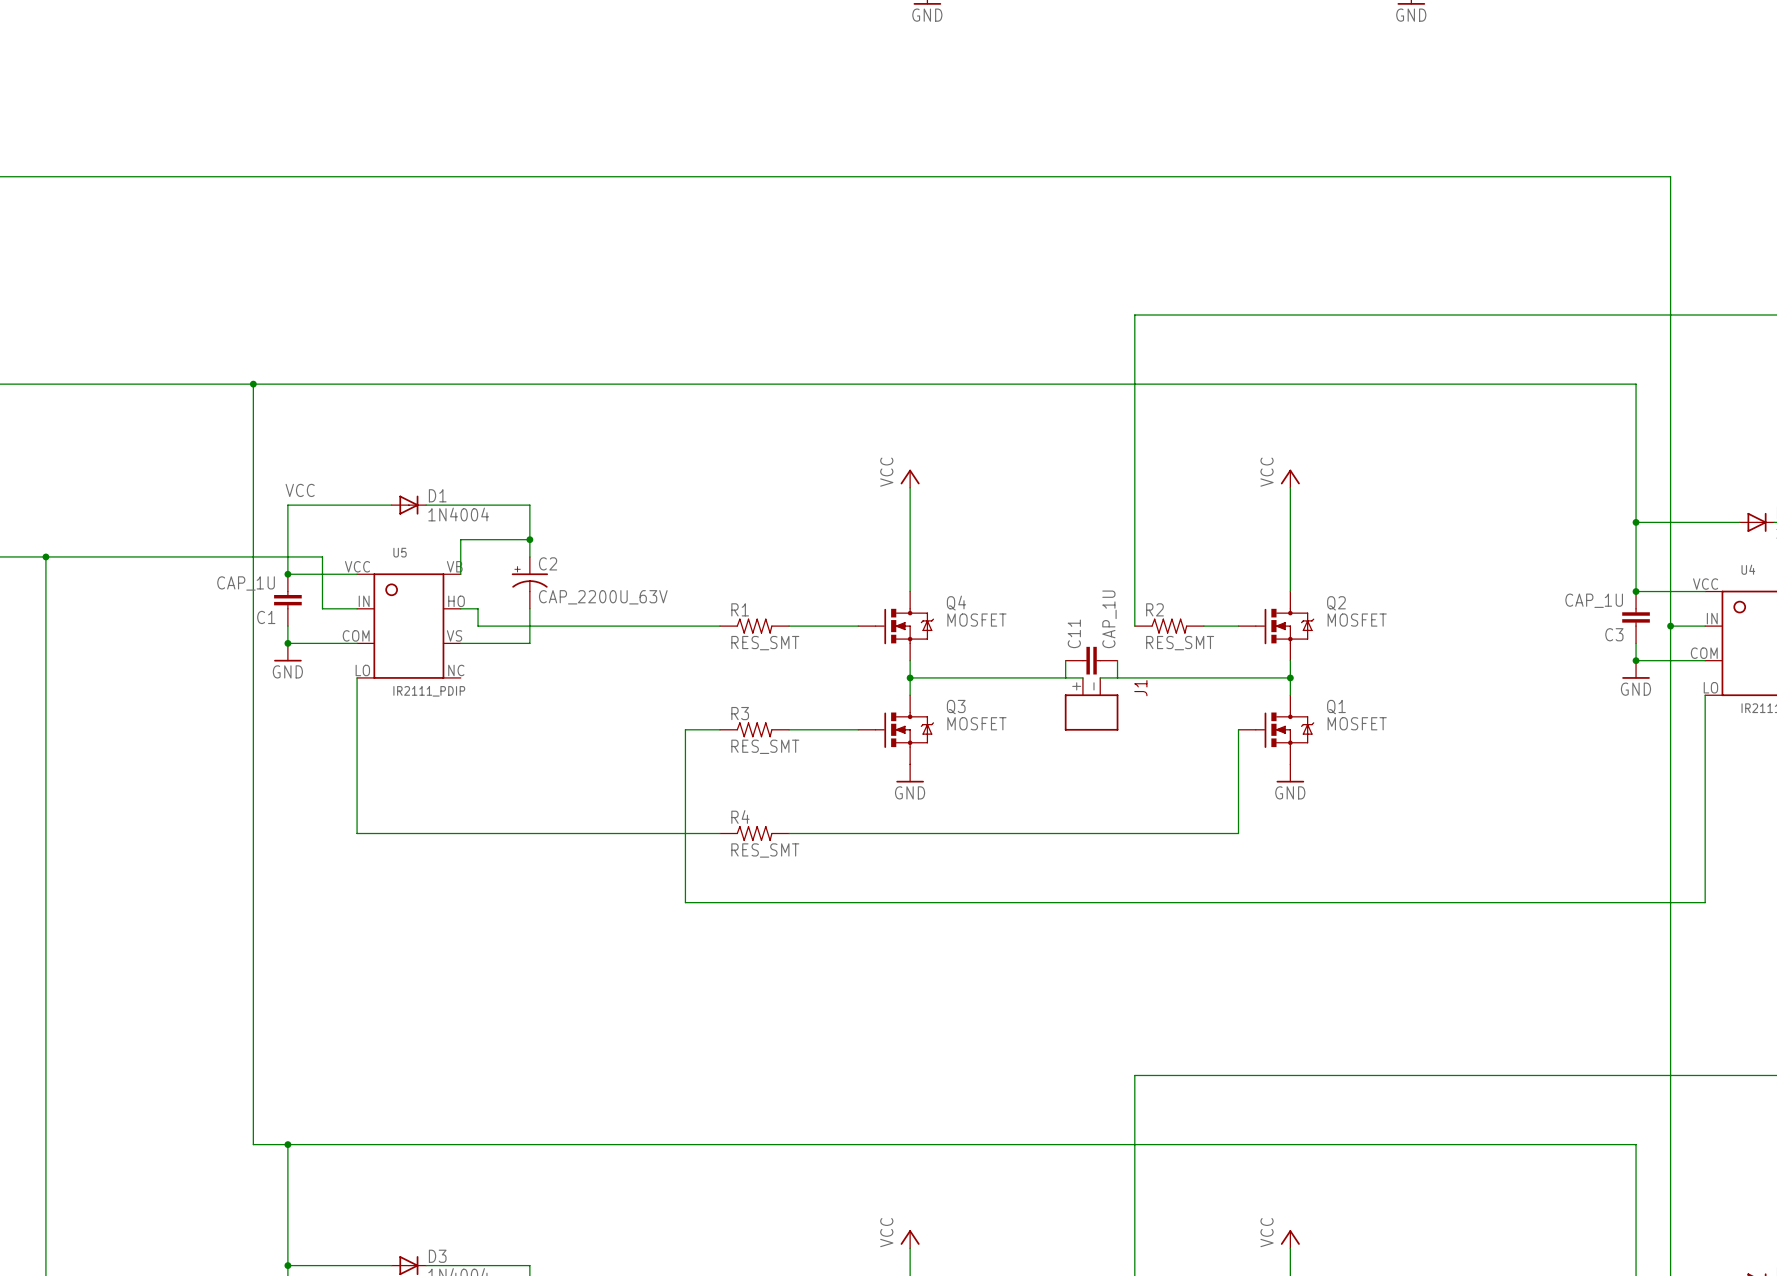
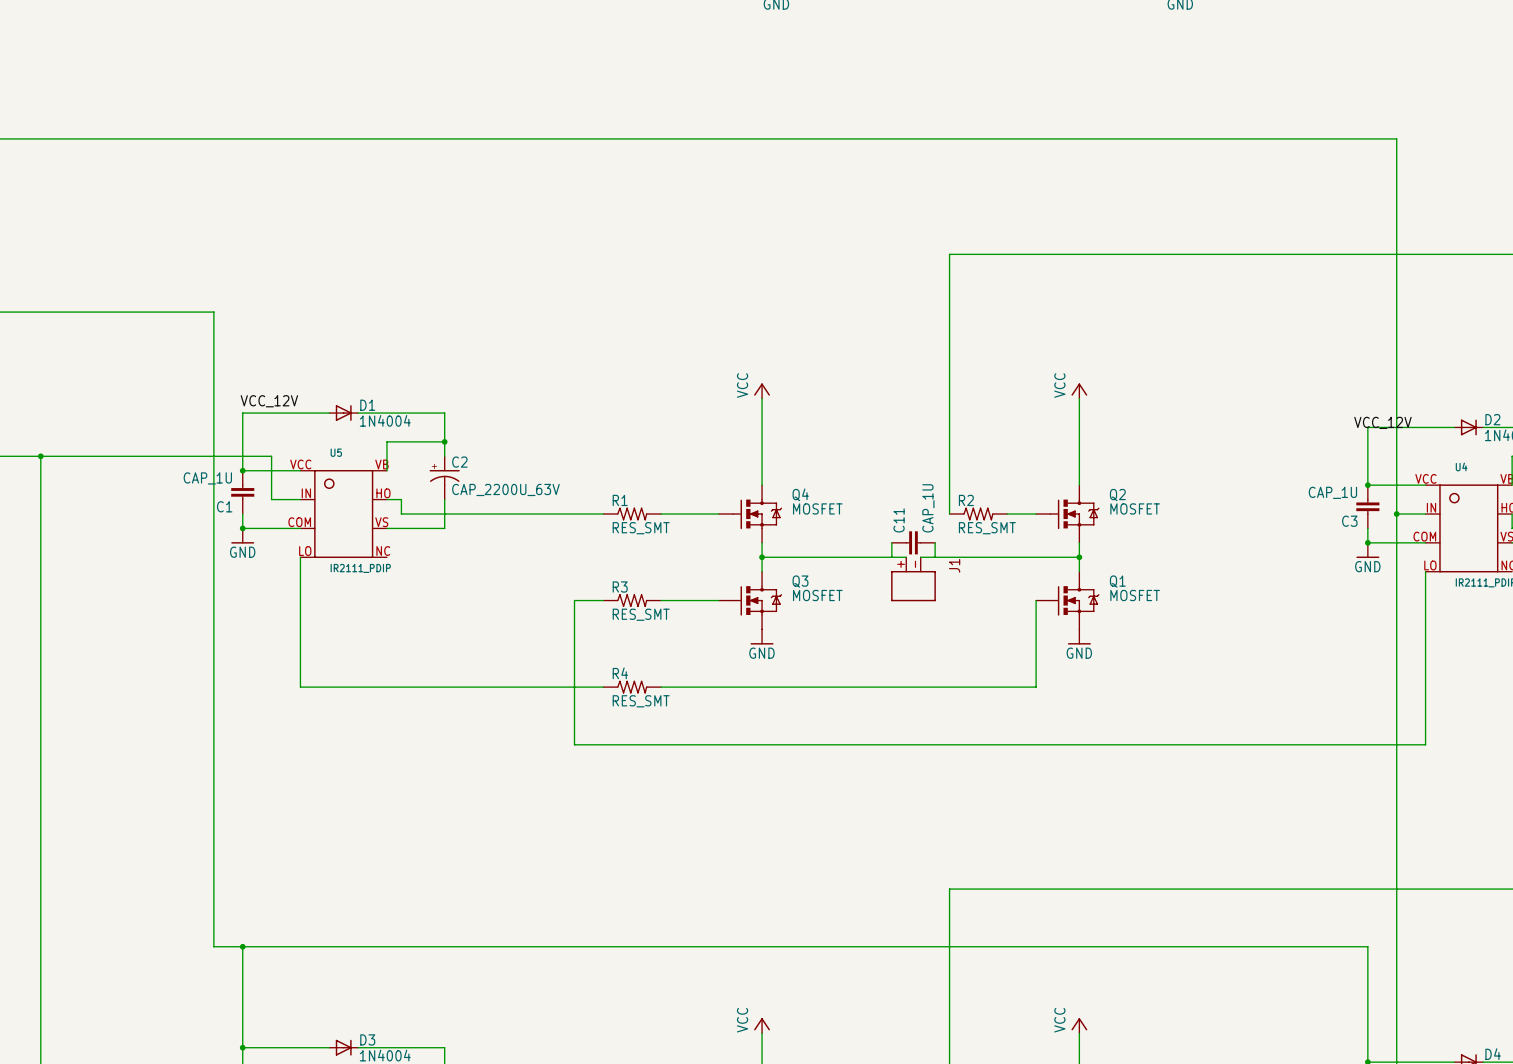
wire: (253, 384) (1636, 384) (1636, 522) -> none
junction: (253, 384) -> none
label: VCC (300, 490) -> VCC_12V (269, 401)
label: none -> VCC_12V (1382, 422)
junction: (1636, 522) -> none

